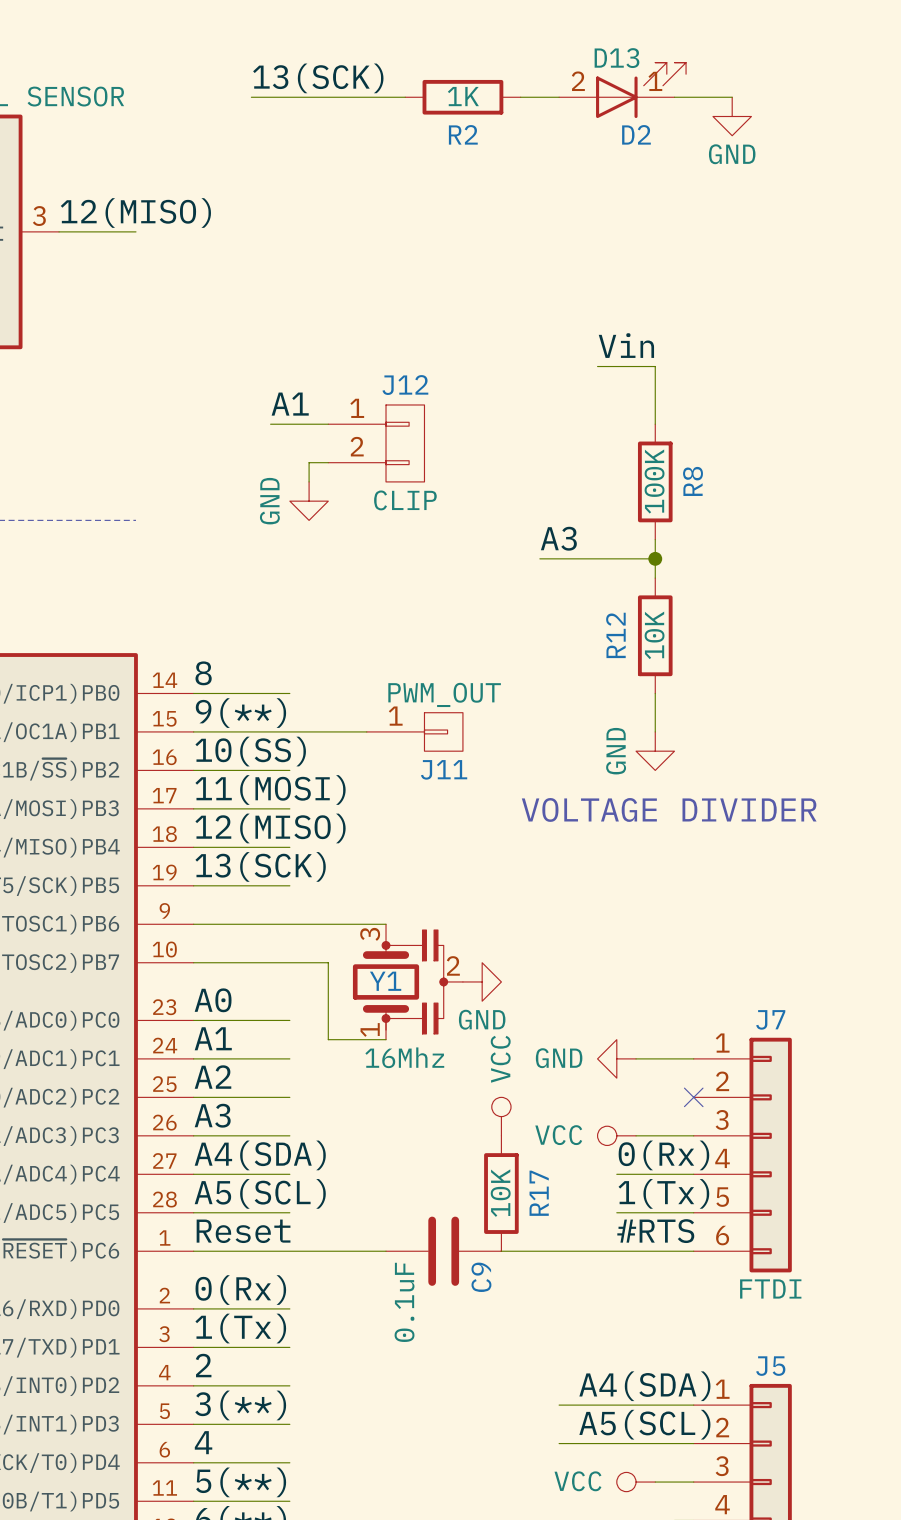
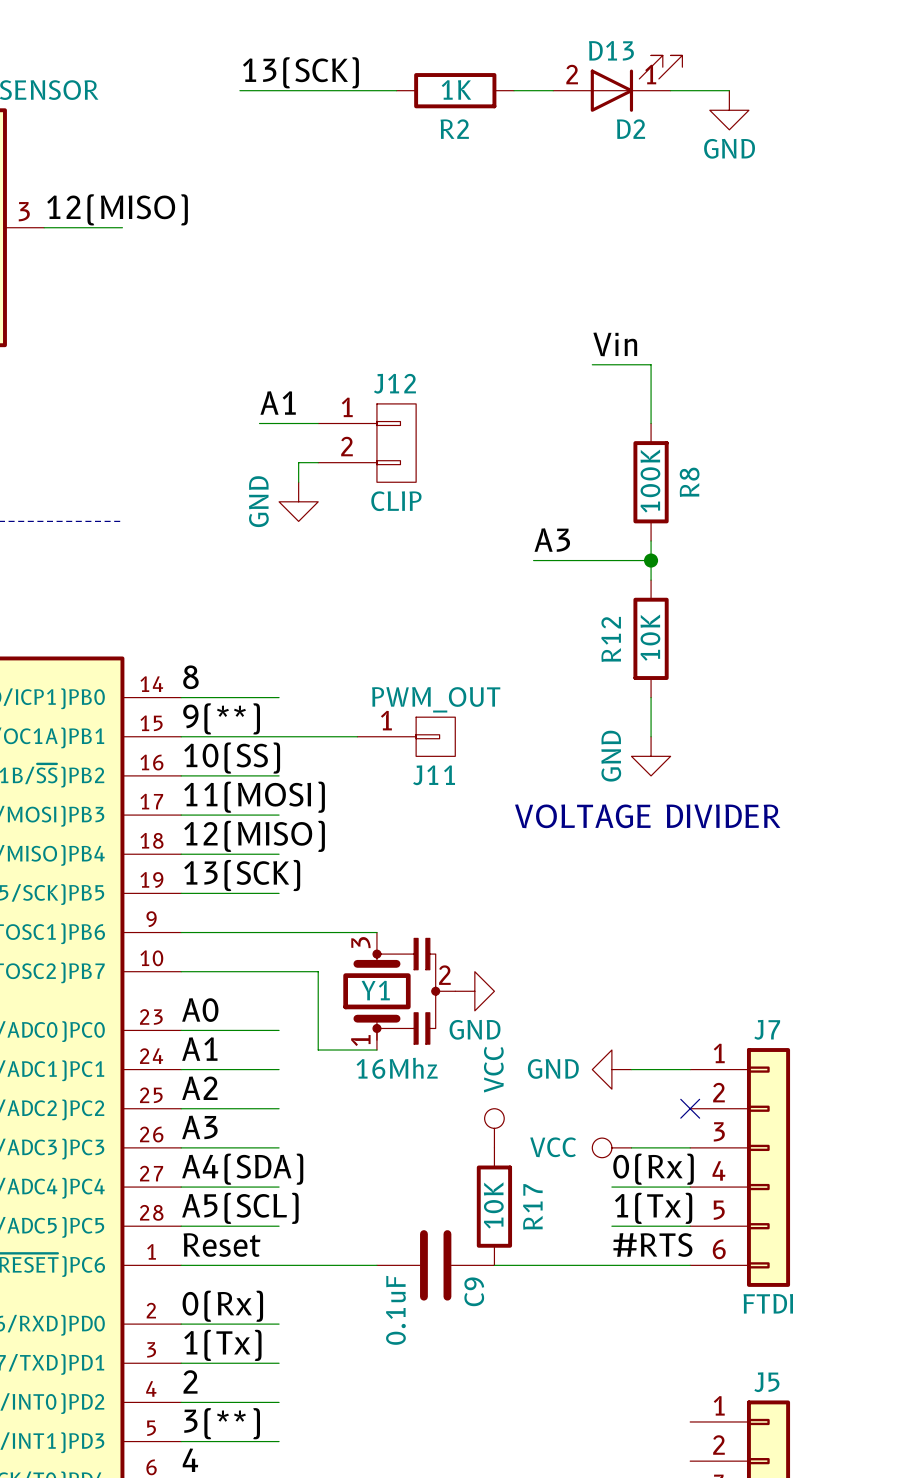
label: A4(SDA) (644, 1386) -> none
wire: (559, 1405) (693, 1405) -> none
label: A5(SCL) (644, 1424) -> none
wire: (559, 1443) (693, 1443) -> none

